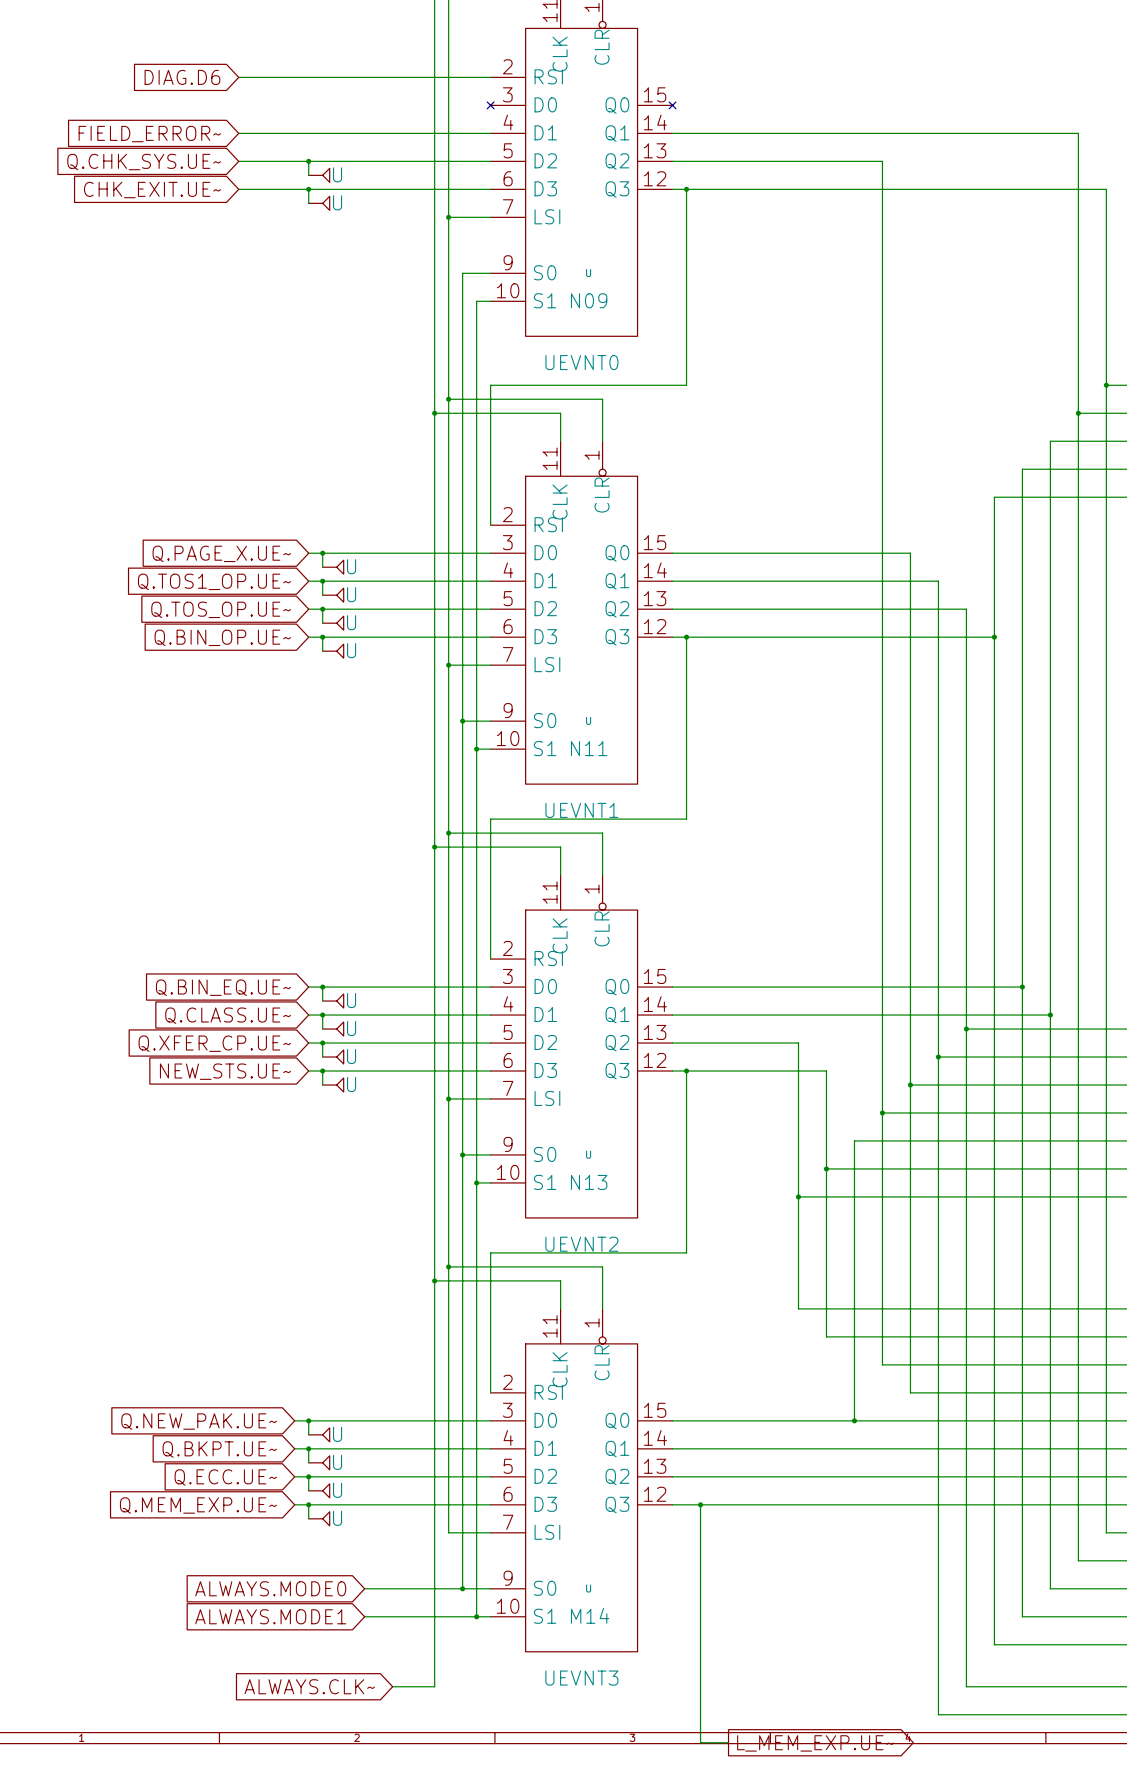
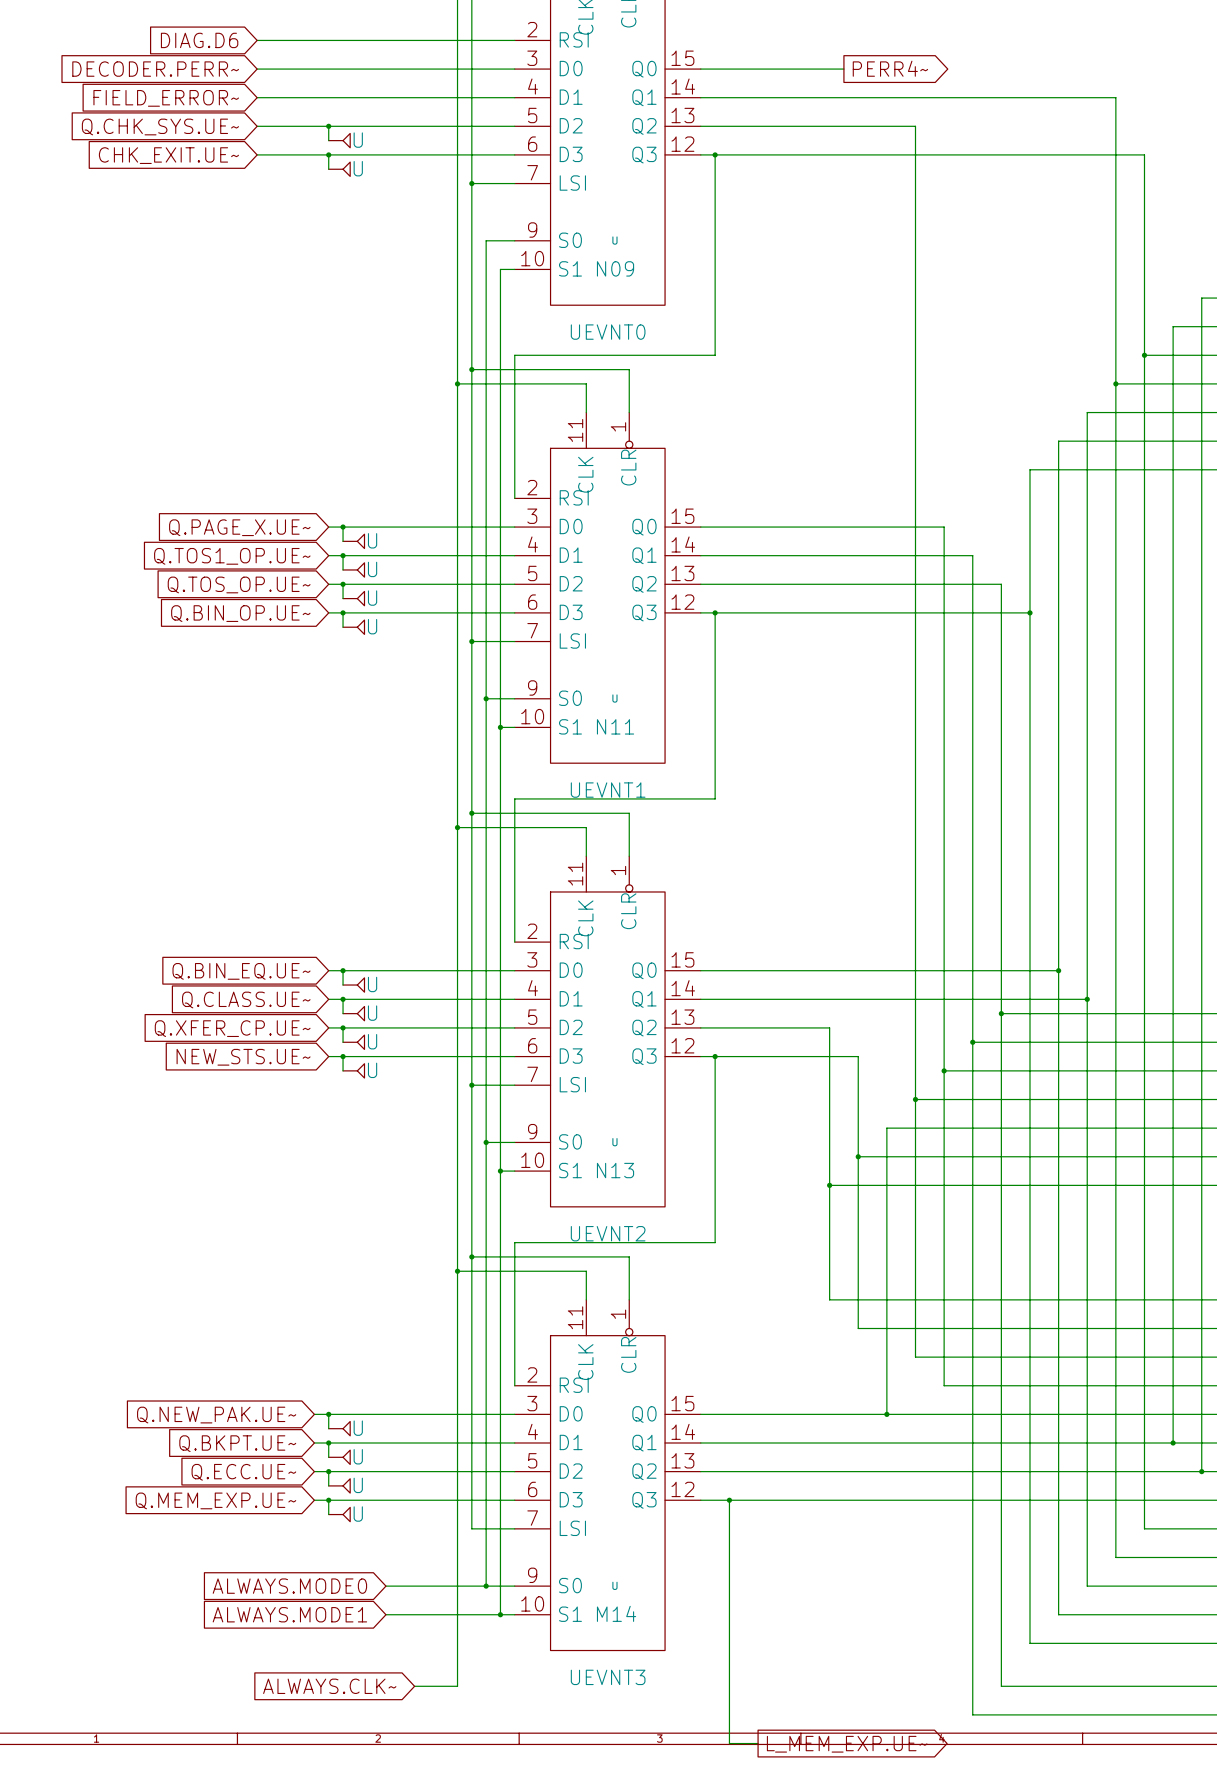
global label: none -> DECODER.PERR~ (155, 69)
wire: none -> (257, 69) (514, 69)
no-connect mark: (490, 105) -> none
wire: none -> (700, 69) (843, 69)
no-connect mark: (672, 105) -> none
global label: none -> PERR4~ (890, 68)

